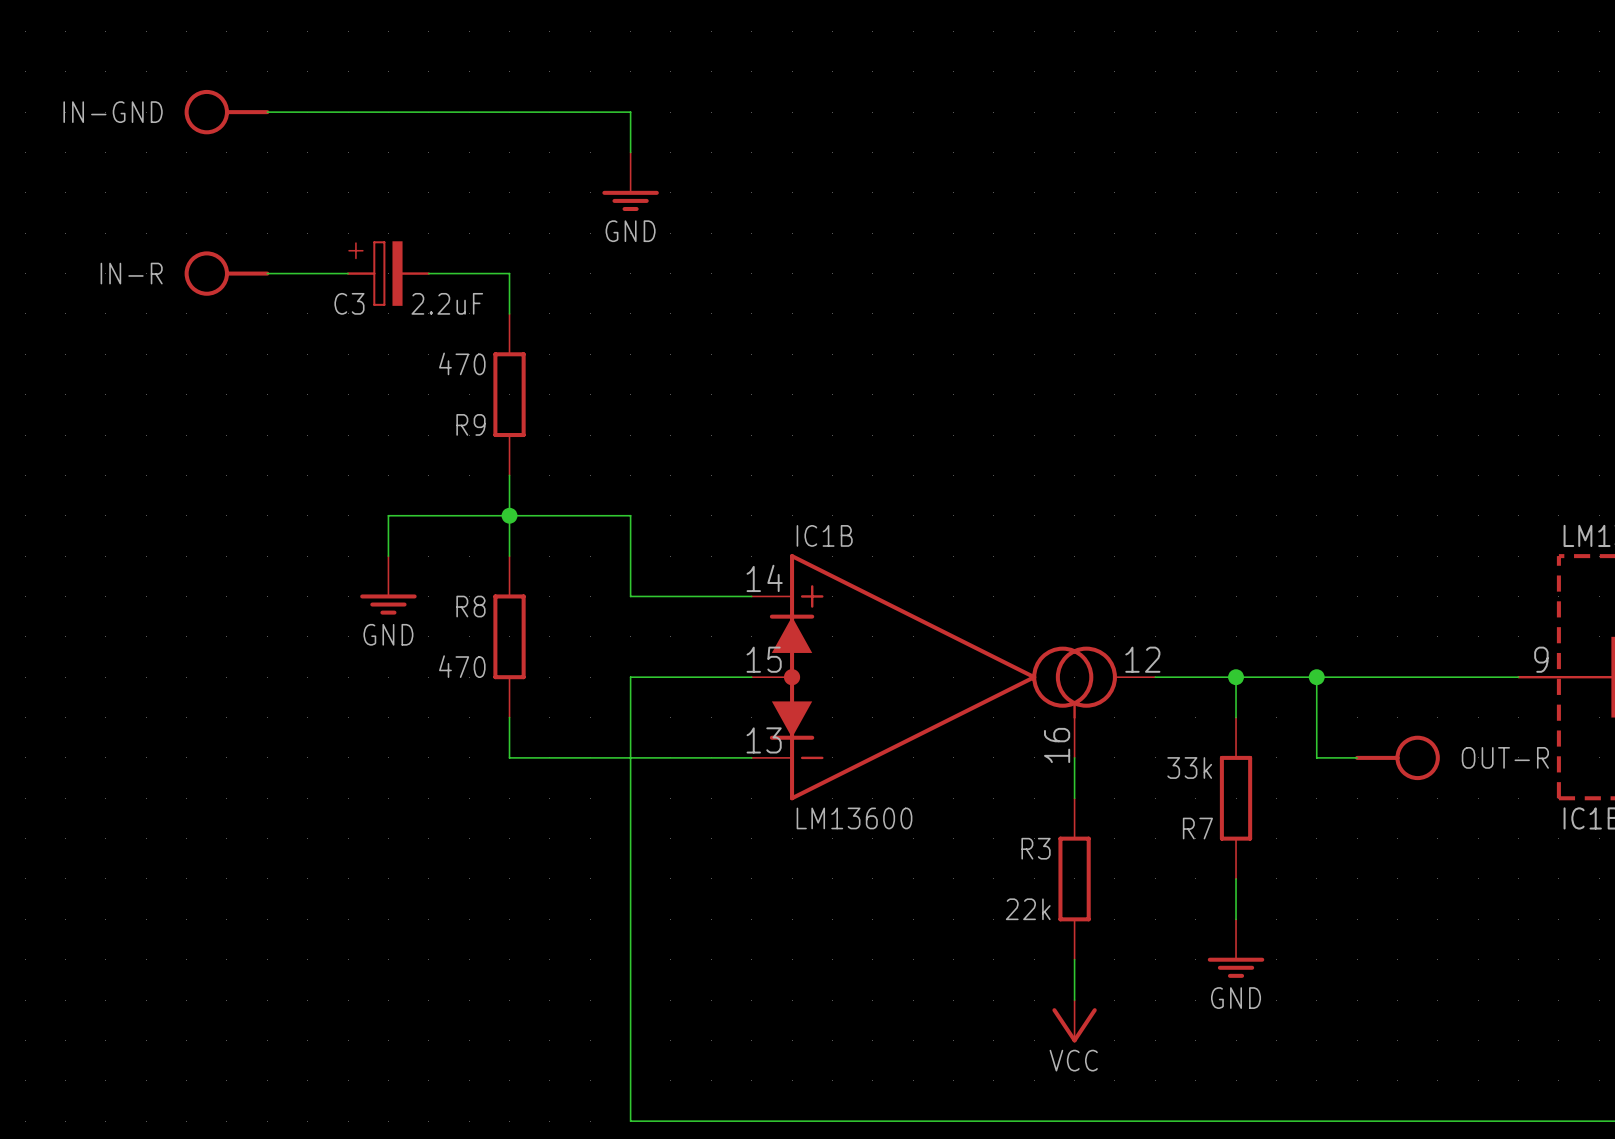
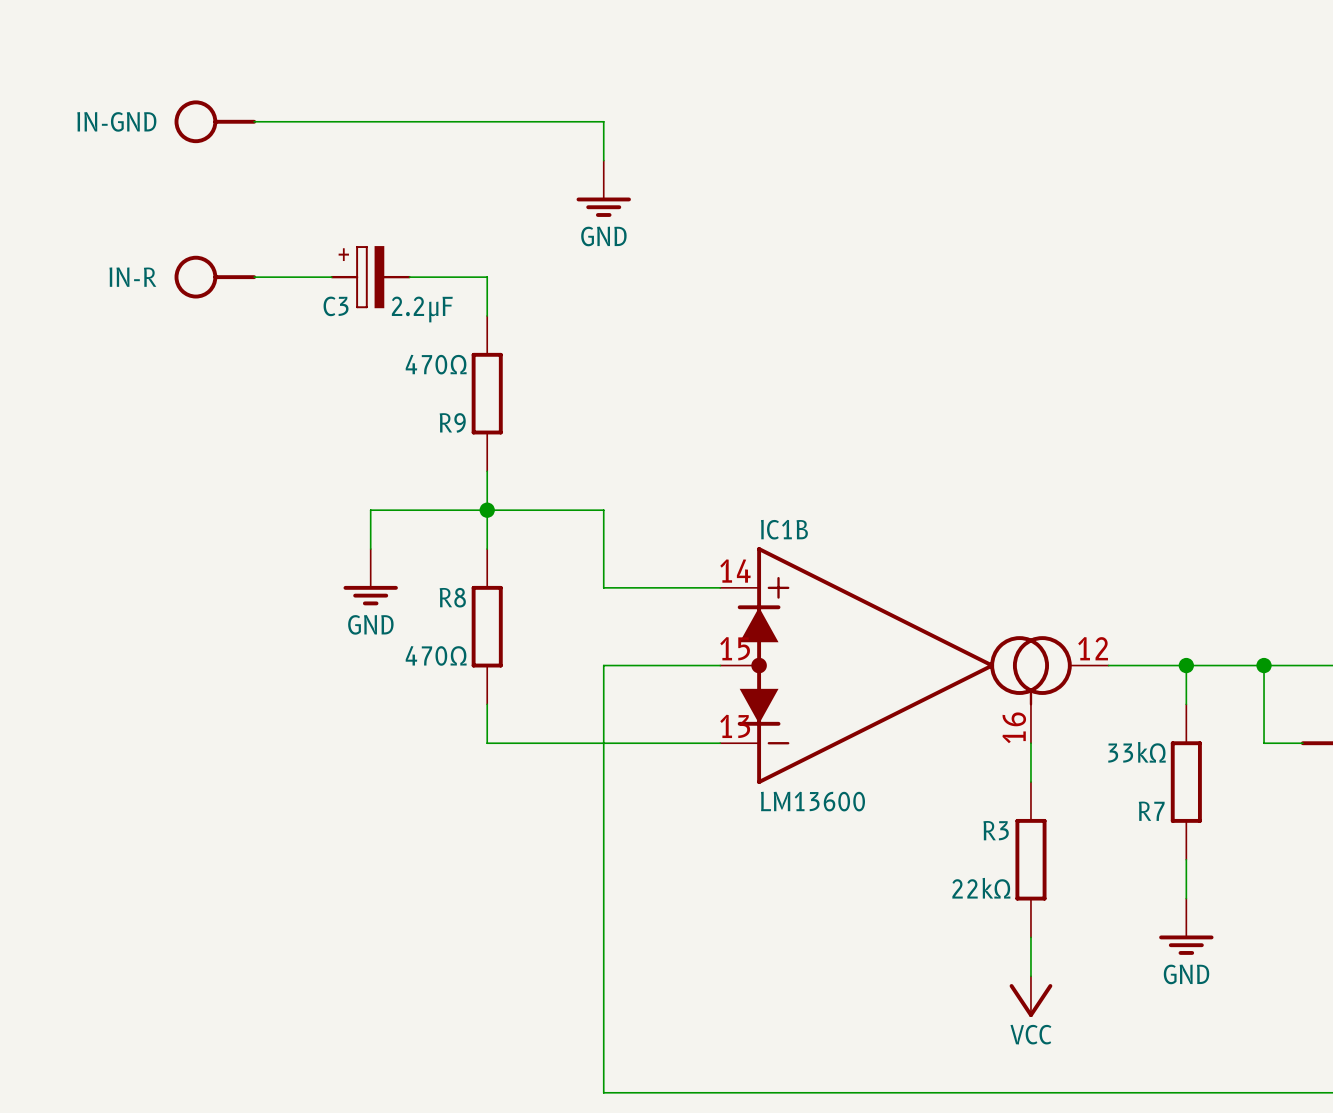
C3 value: 2.2uF (447, 303) -> 2.2μF (422, 309)
R9 value: 470 (462, 363) -> 470Ω (436, 364)
R8 value: 470 (462, 666) -> 470Ω (436, 655)
R7 value: 33k (1189, 768) -> 33kΩ (1137, 752)
R3 value: 22k (1028, 909) -> 22kΩ (981, 888)

